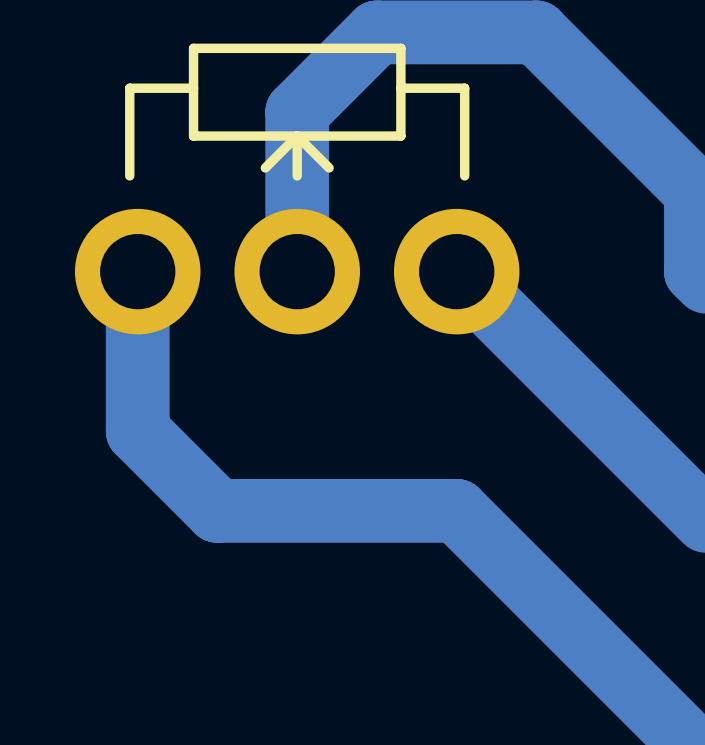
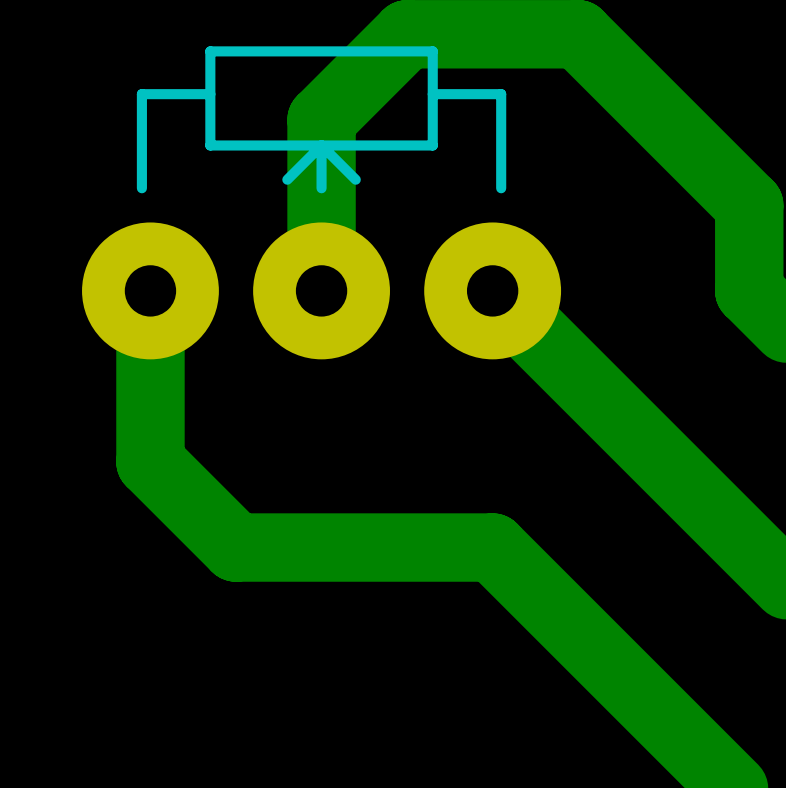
part footprint: [74, 43, 520, 335] -> [82, 46, 562, 360]

